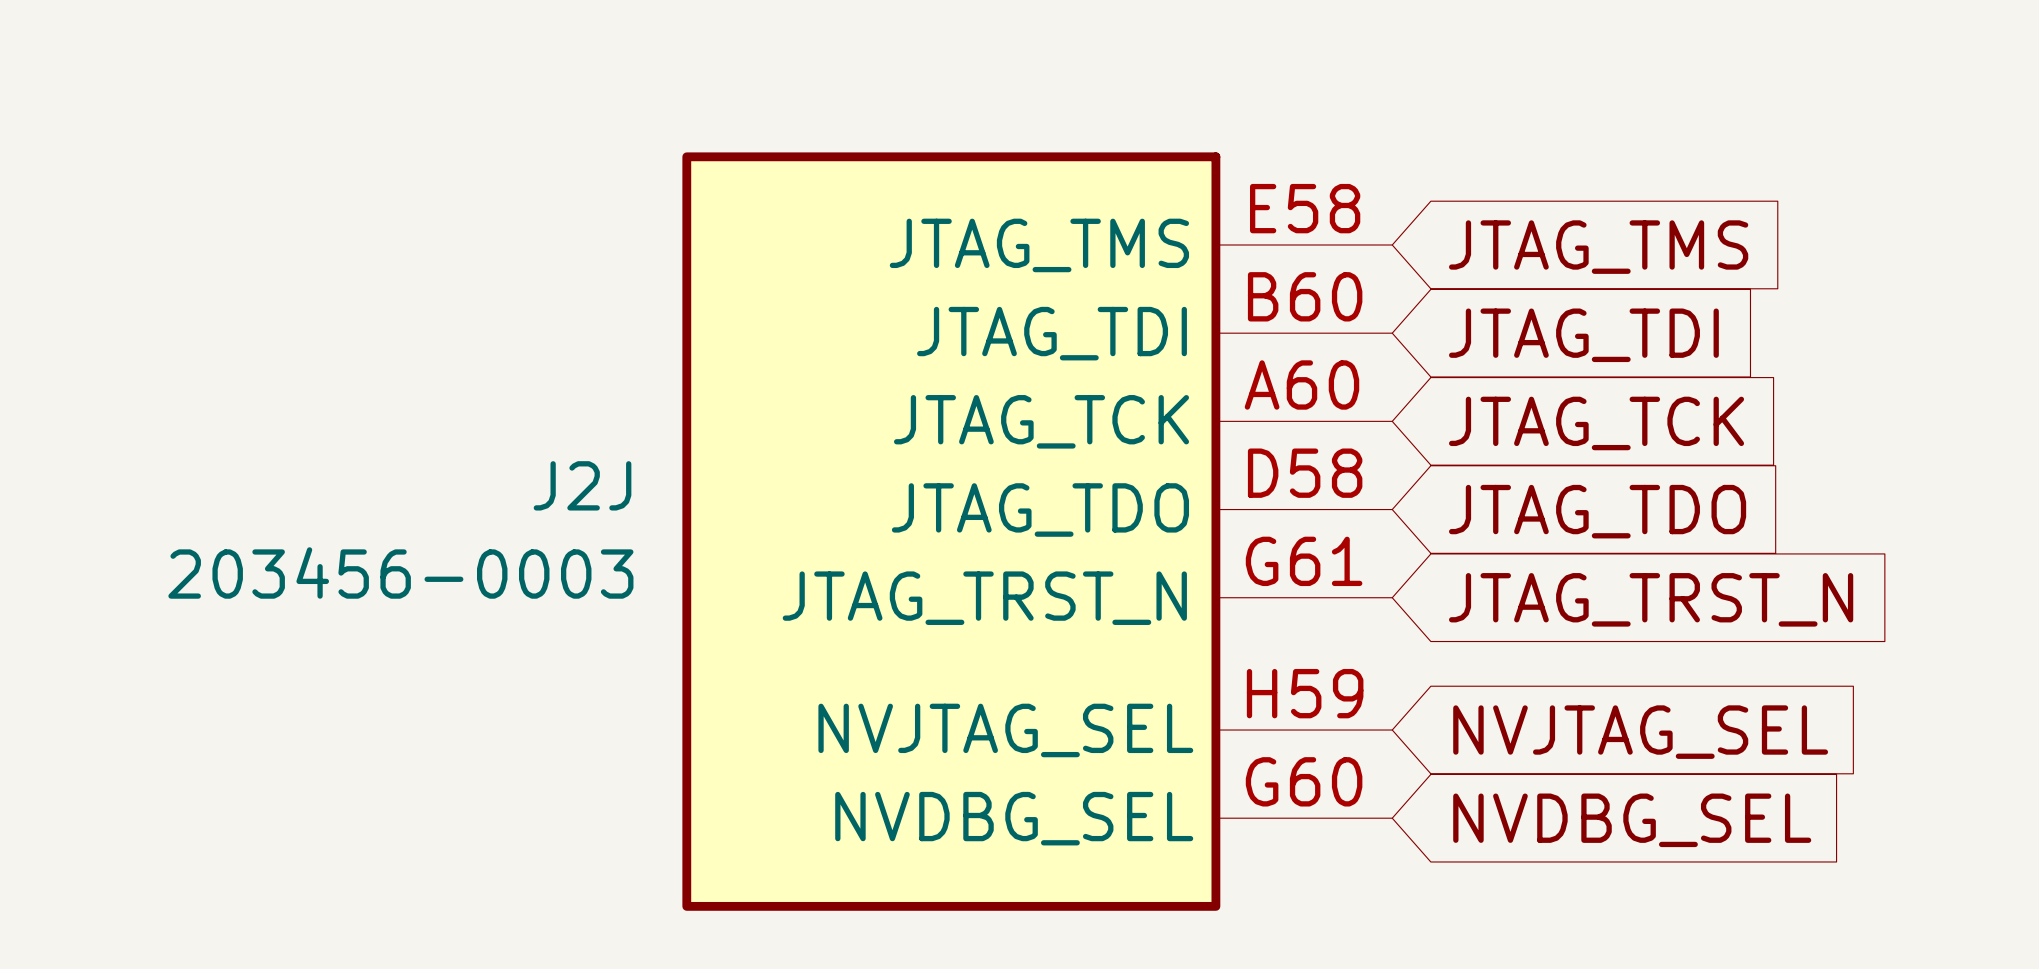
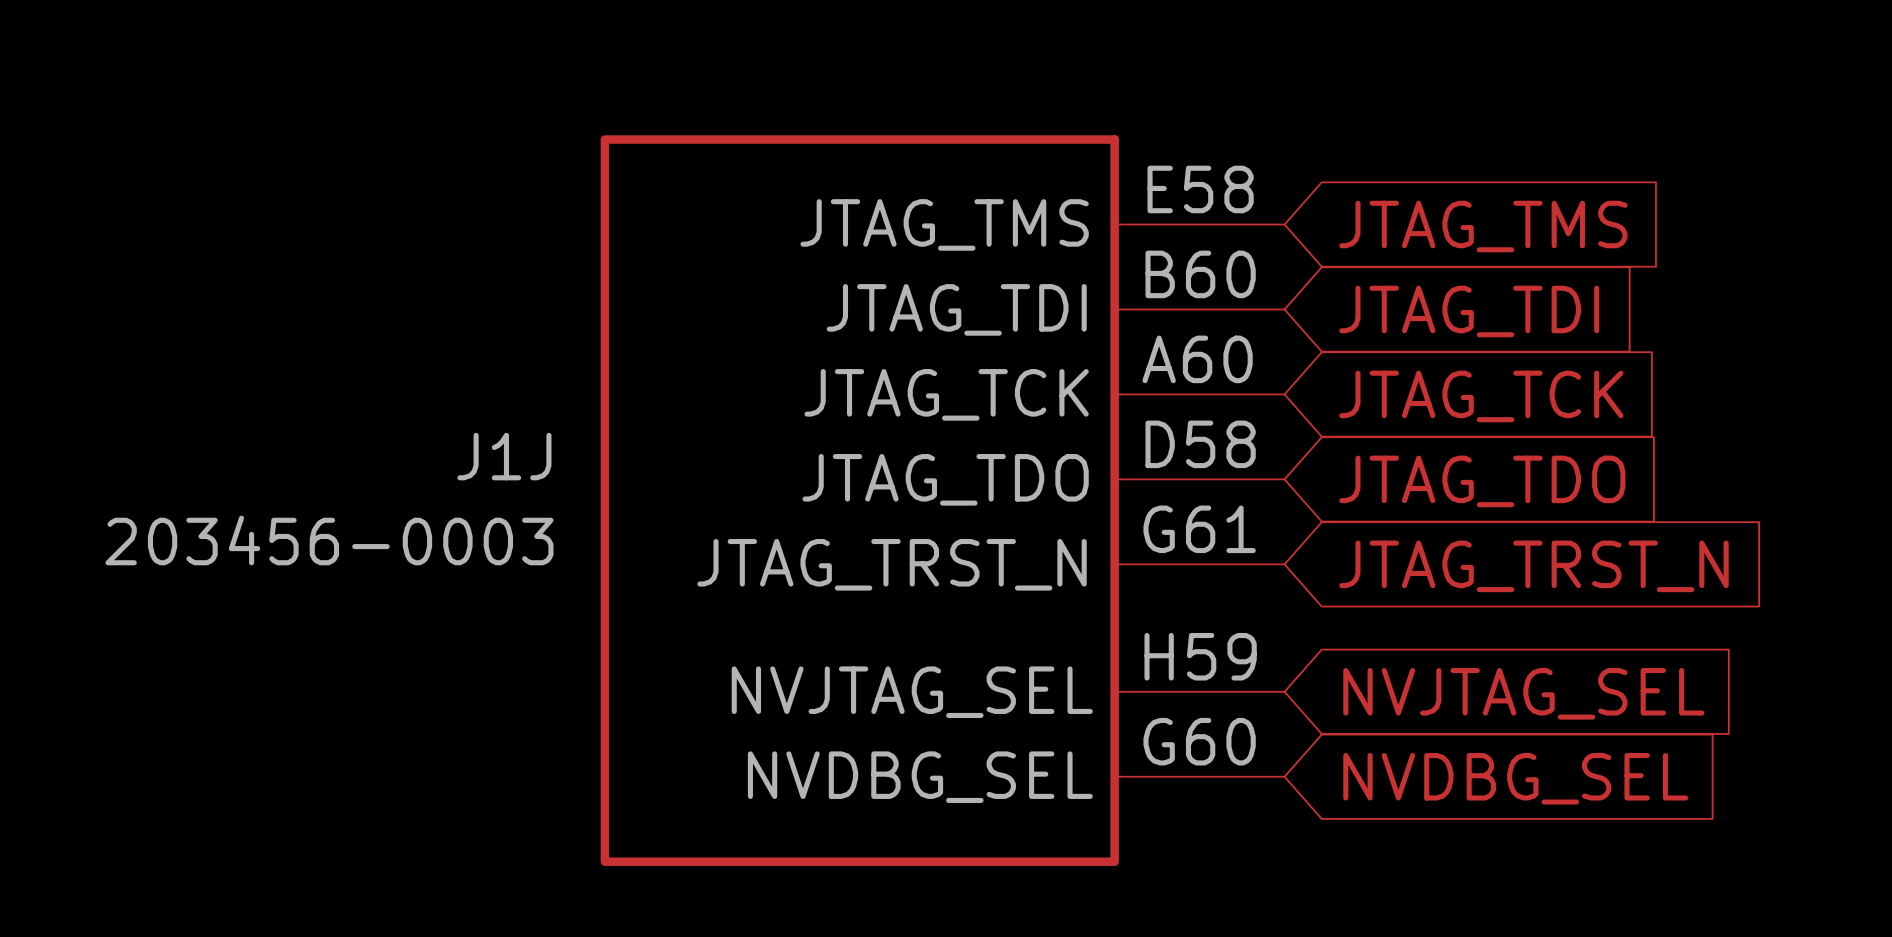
J2J name: J2J (582, 485) -> J1J (504, 456)

